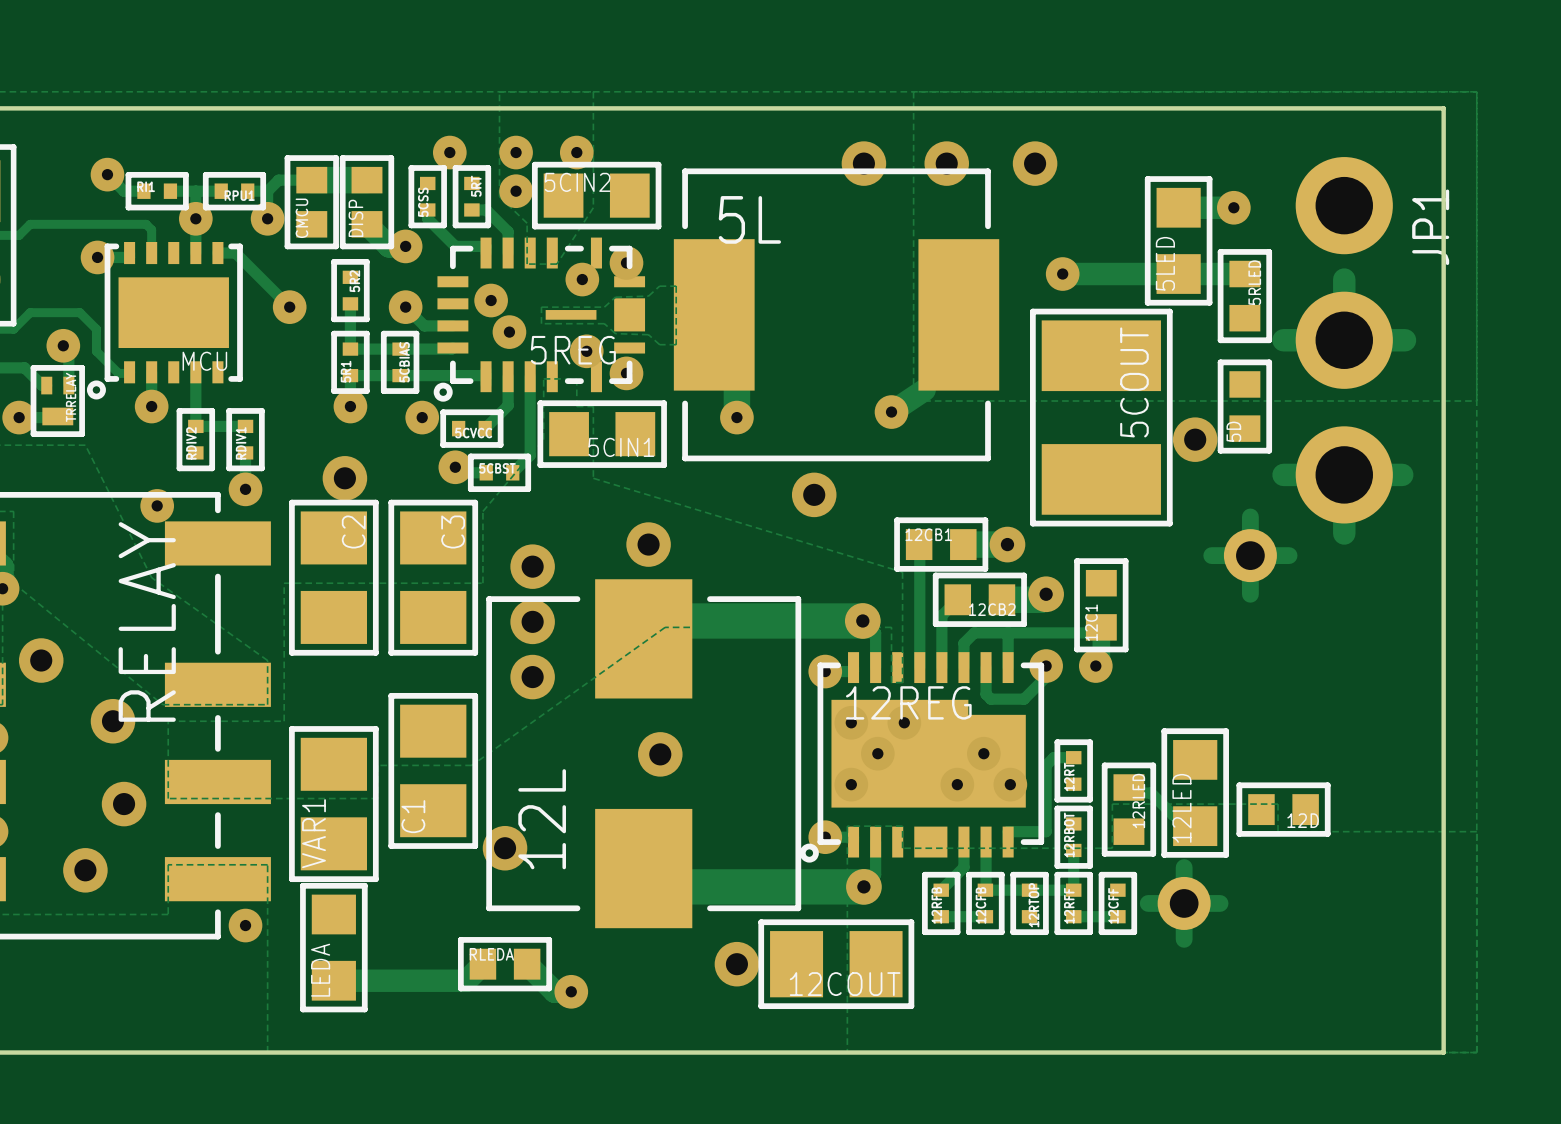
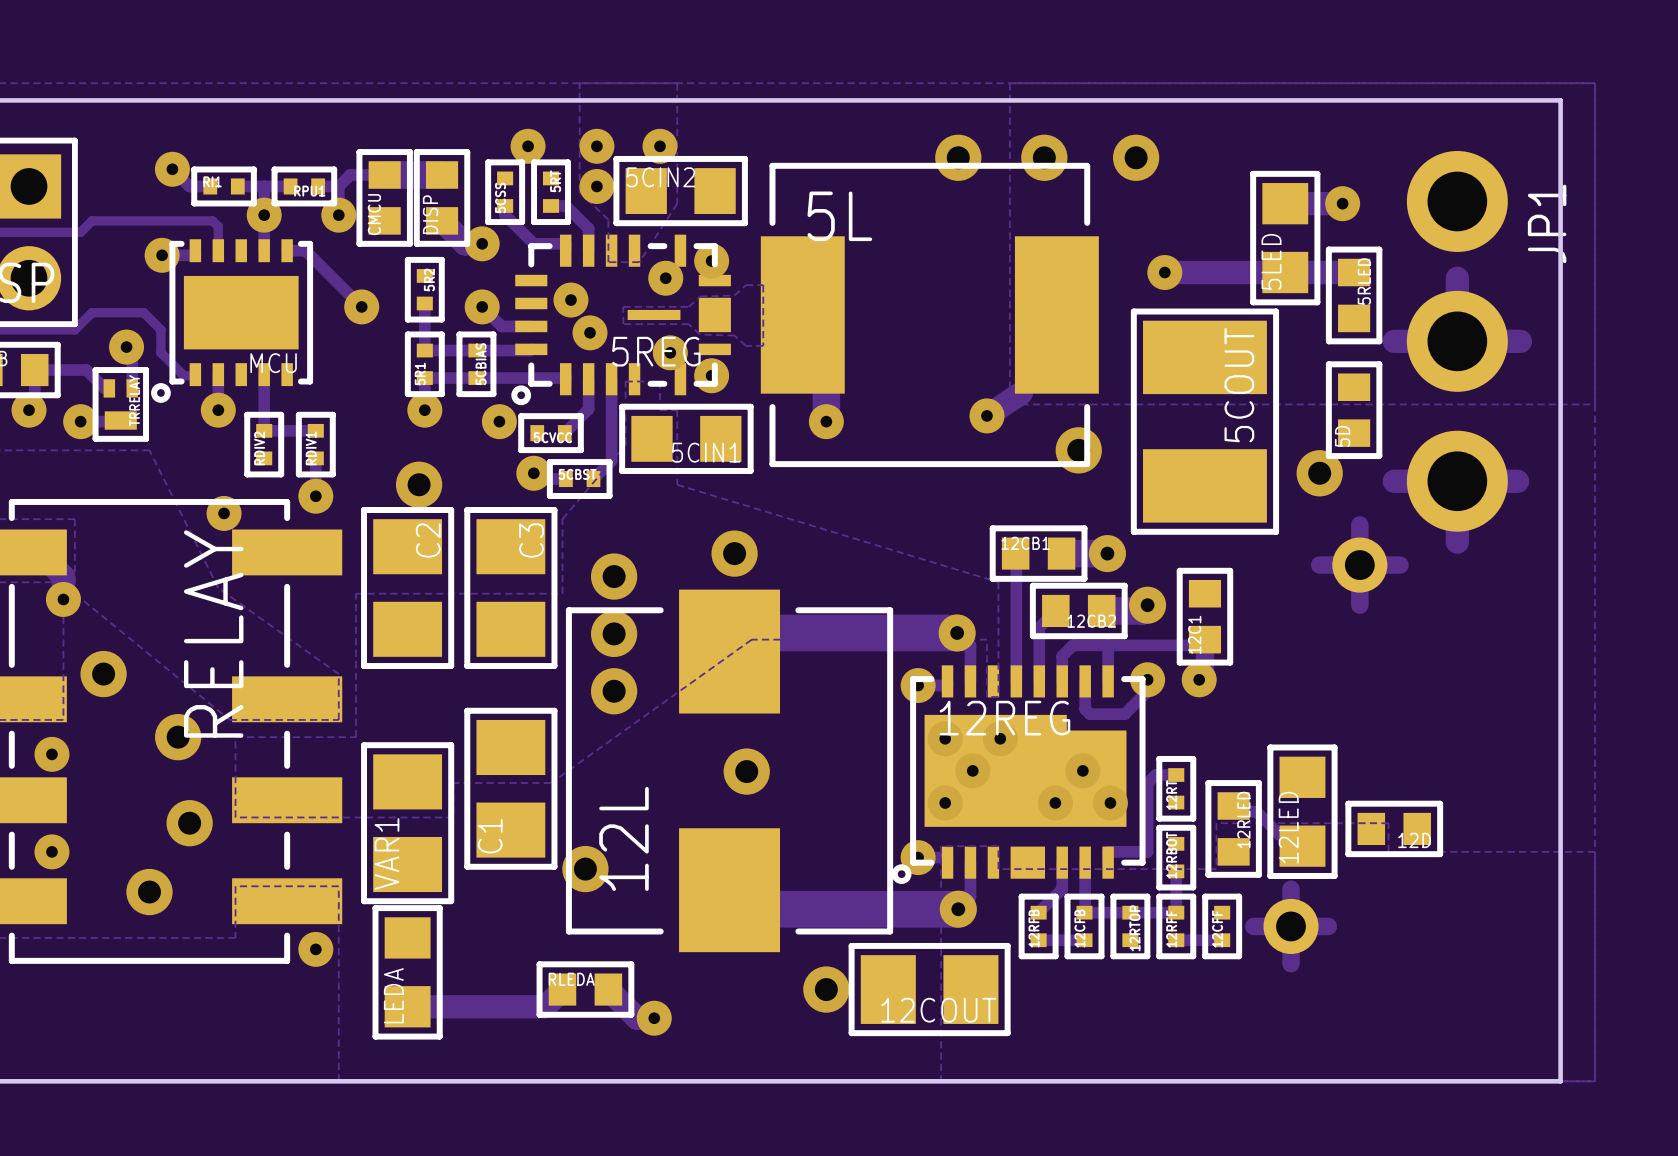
via position: (1195, 439) -> (1319, 473)
via: none -> (1078, 450)
via: (814, 494) -> none

